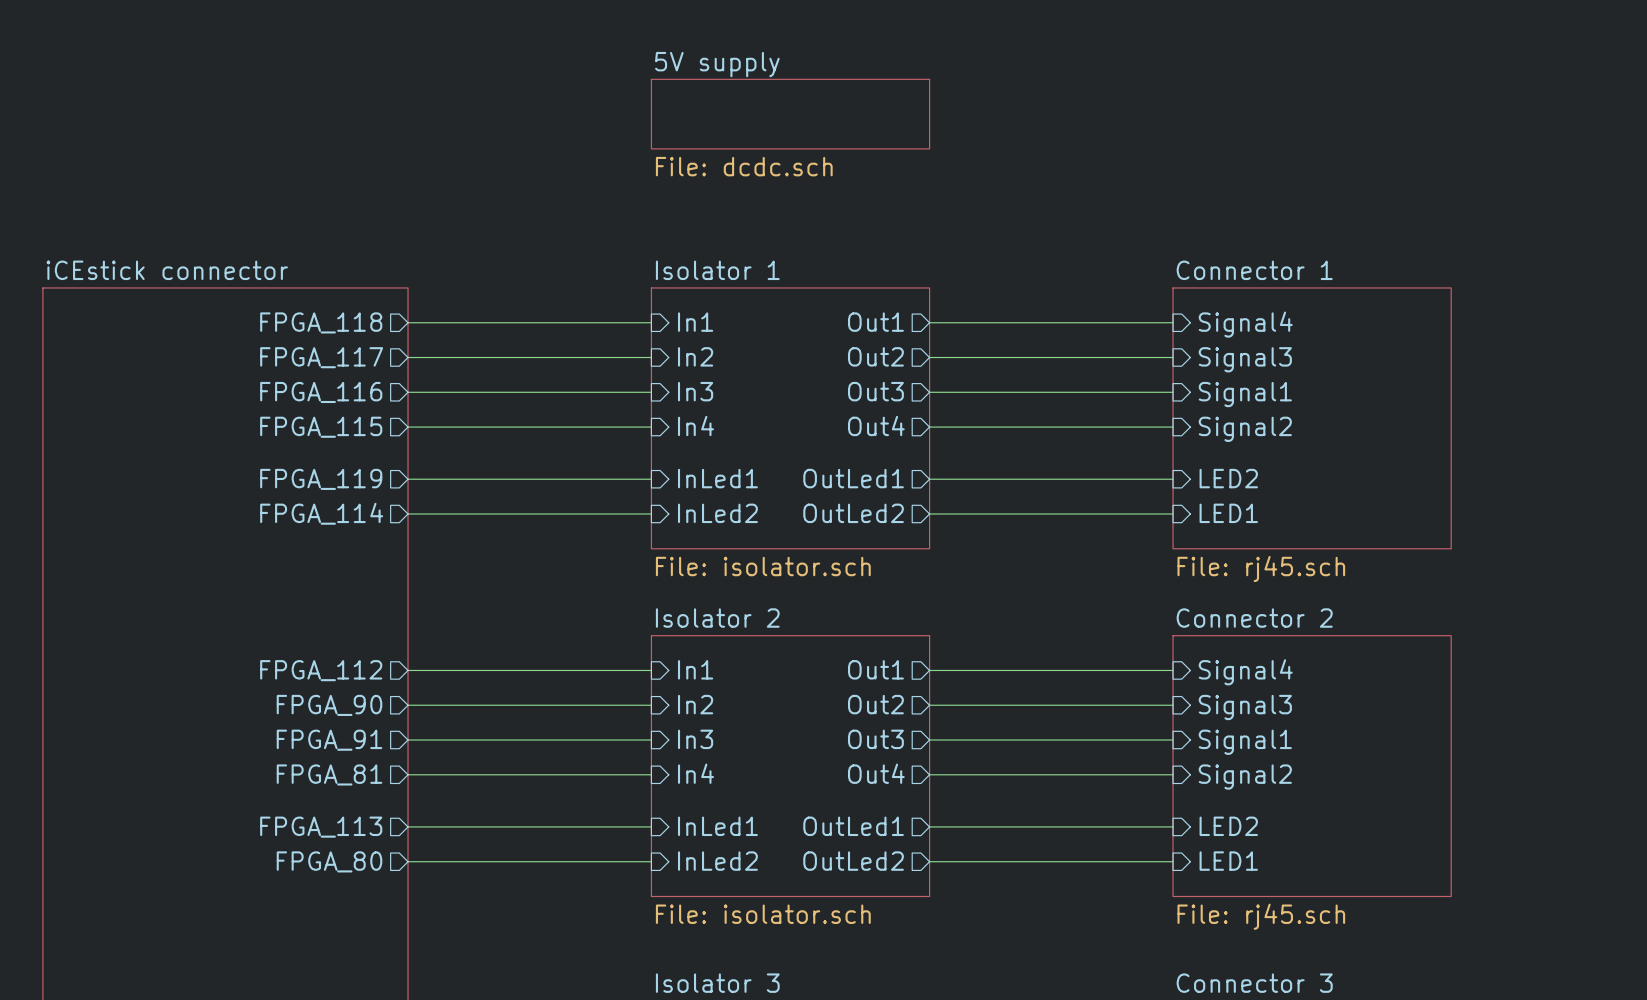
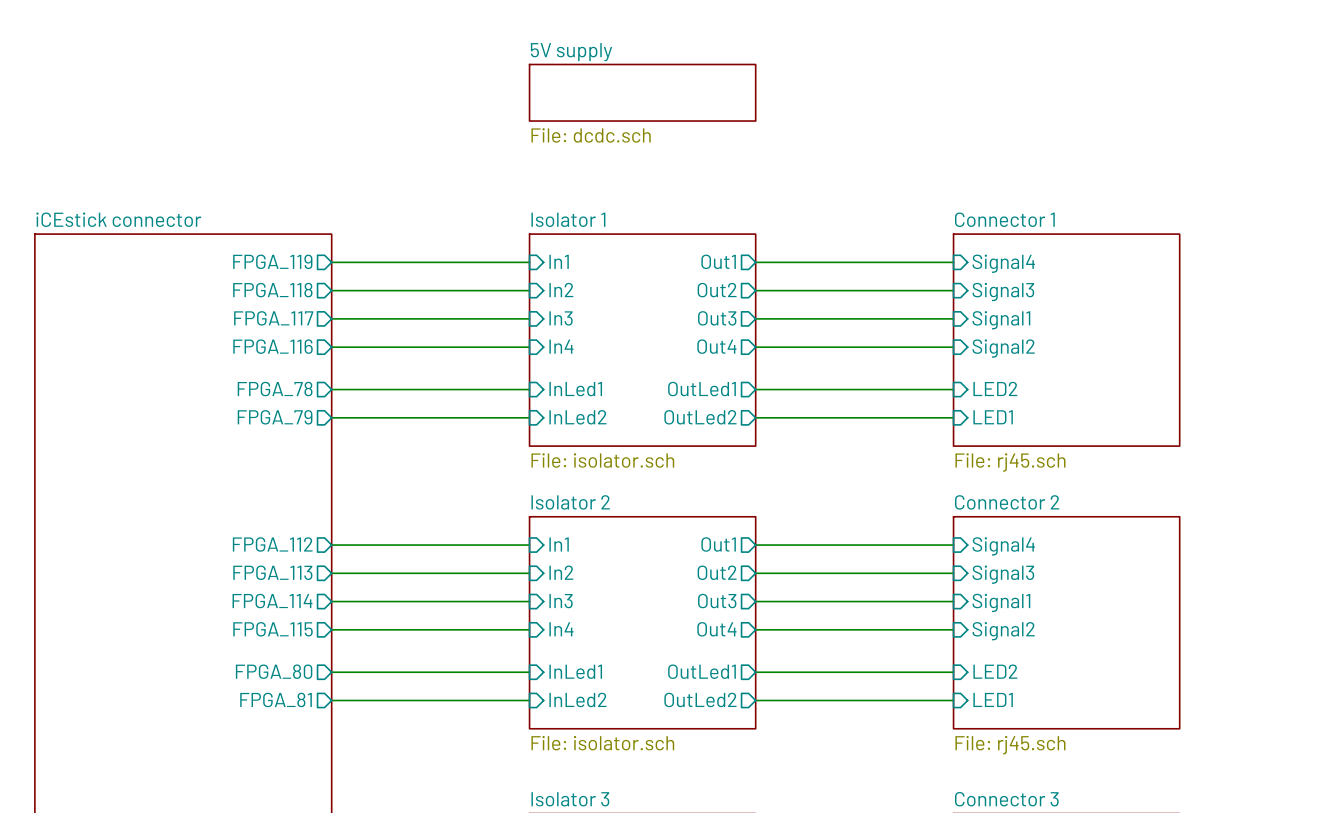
sheet pin: FPGA_118 (321, 322) -> FPGA_119 (272, 261)
sheet pin: FPGA_117 (321, 357) -> FPGA_118 (272, 290)
sheet pin: FPGA_116 (321, 392) -> FPGA_117 (273, 318)
sheet pin: FPGA_115 (321, 427) -> FPGA_116 (272, 346)
sheet pin: FPGA_119 (321, 479) -> FPGA_78 (275, 389)
sheet pin: FPGA_114 (321, 513) -> FPGA_79 (275, 417)
sheet pin: FPGA_90 (329, 705) -> FPGA_113 (272, 572)
sheet pin: FPGA_91 (329, 740) -> FPGA_114 (272, 601)
sheet pin: FPGA_81 (329, 774) -> FPGA_115 (273, 629)
sheet pin: FPGA_113 (321, 827) -> FPGA_80 (274, 671)
sheet pin: FPGA_80 (329, 861) -> FPGA_81 (276, 699)

